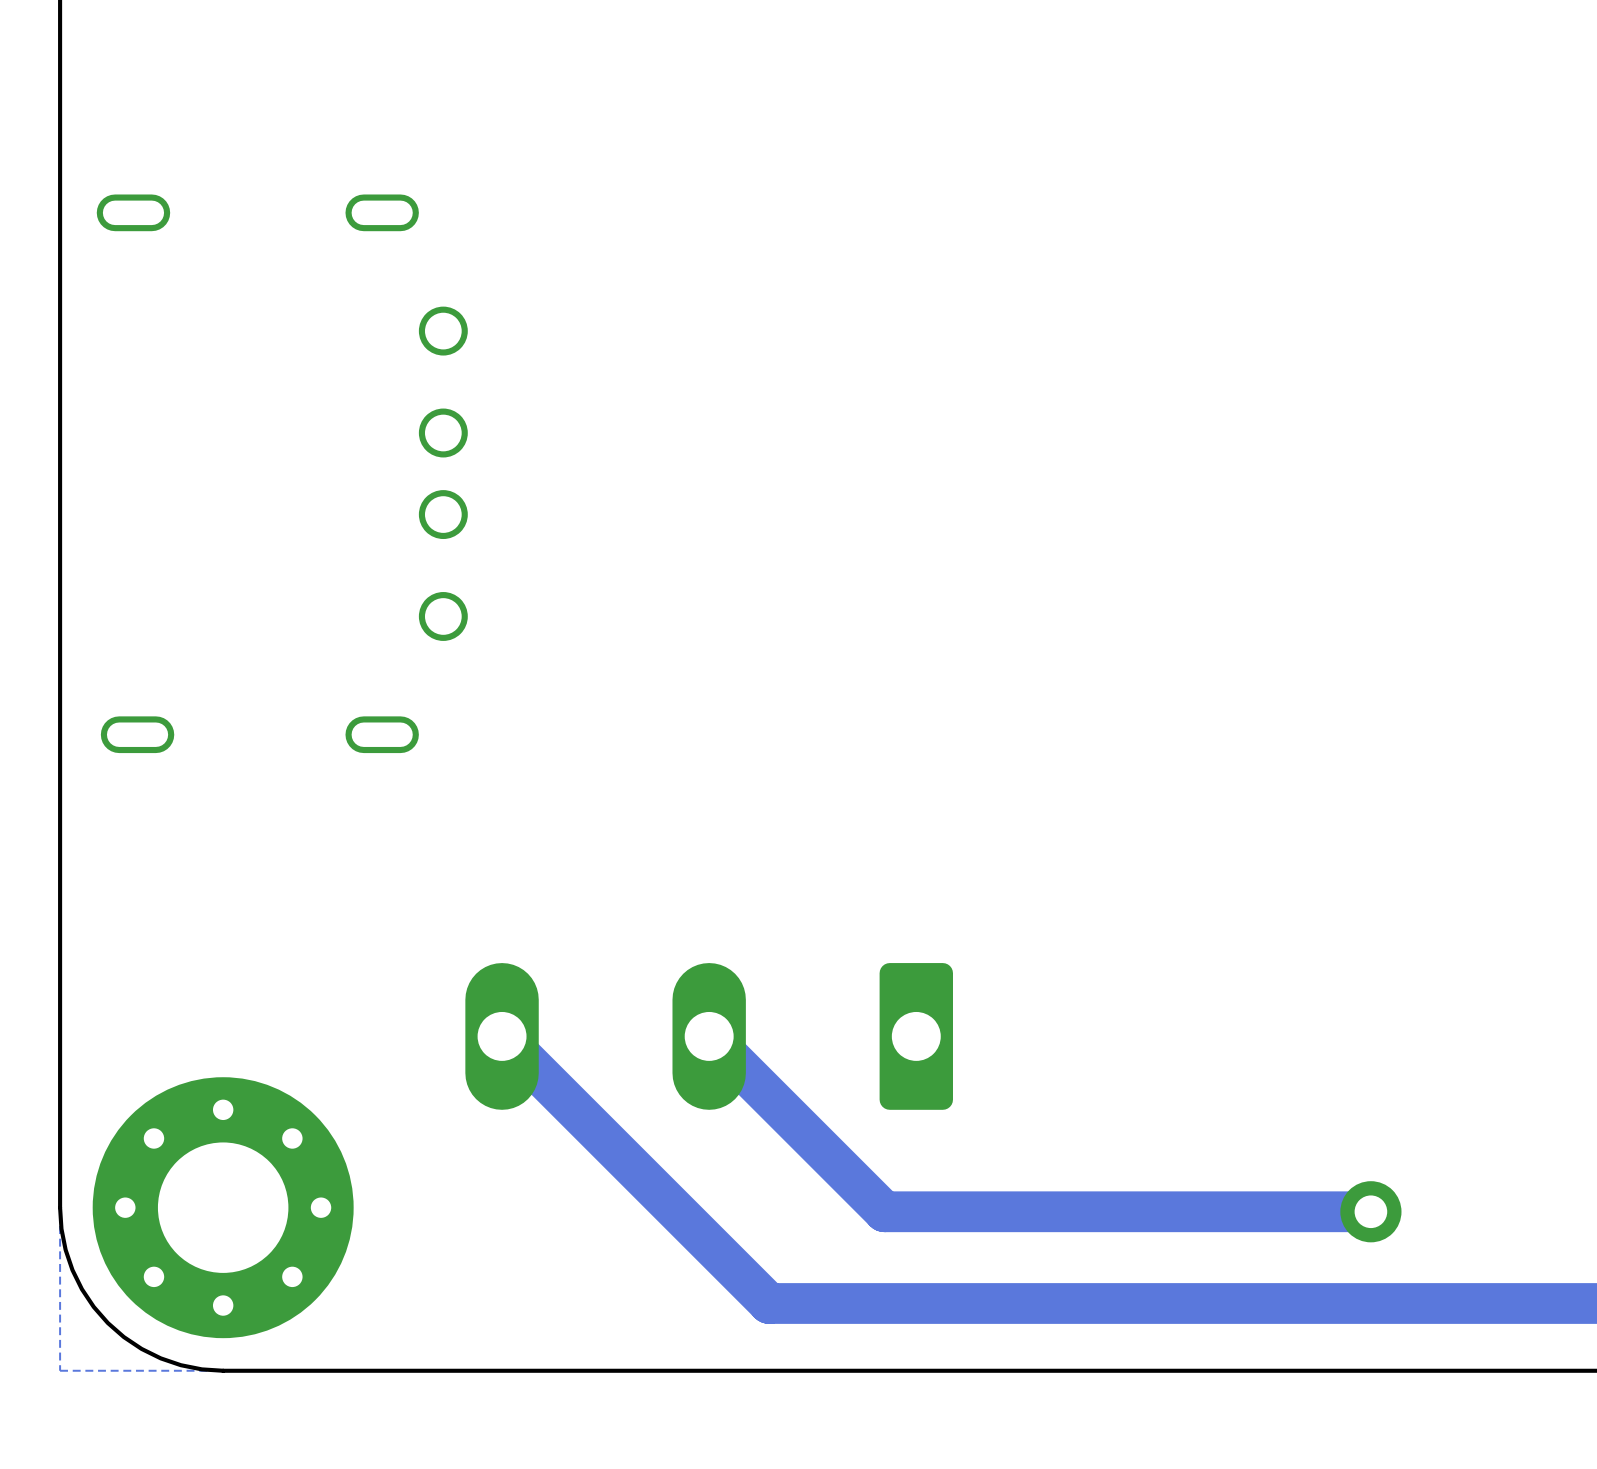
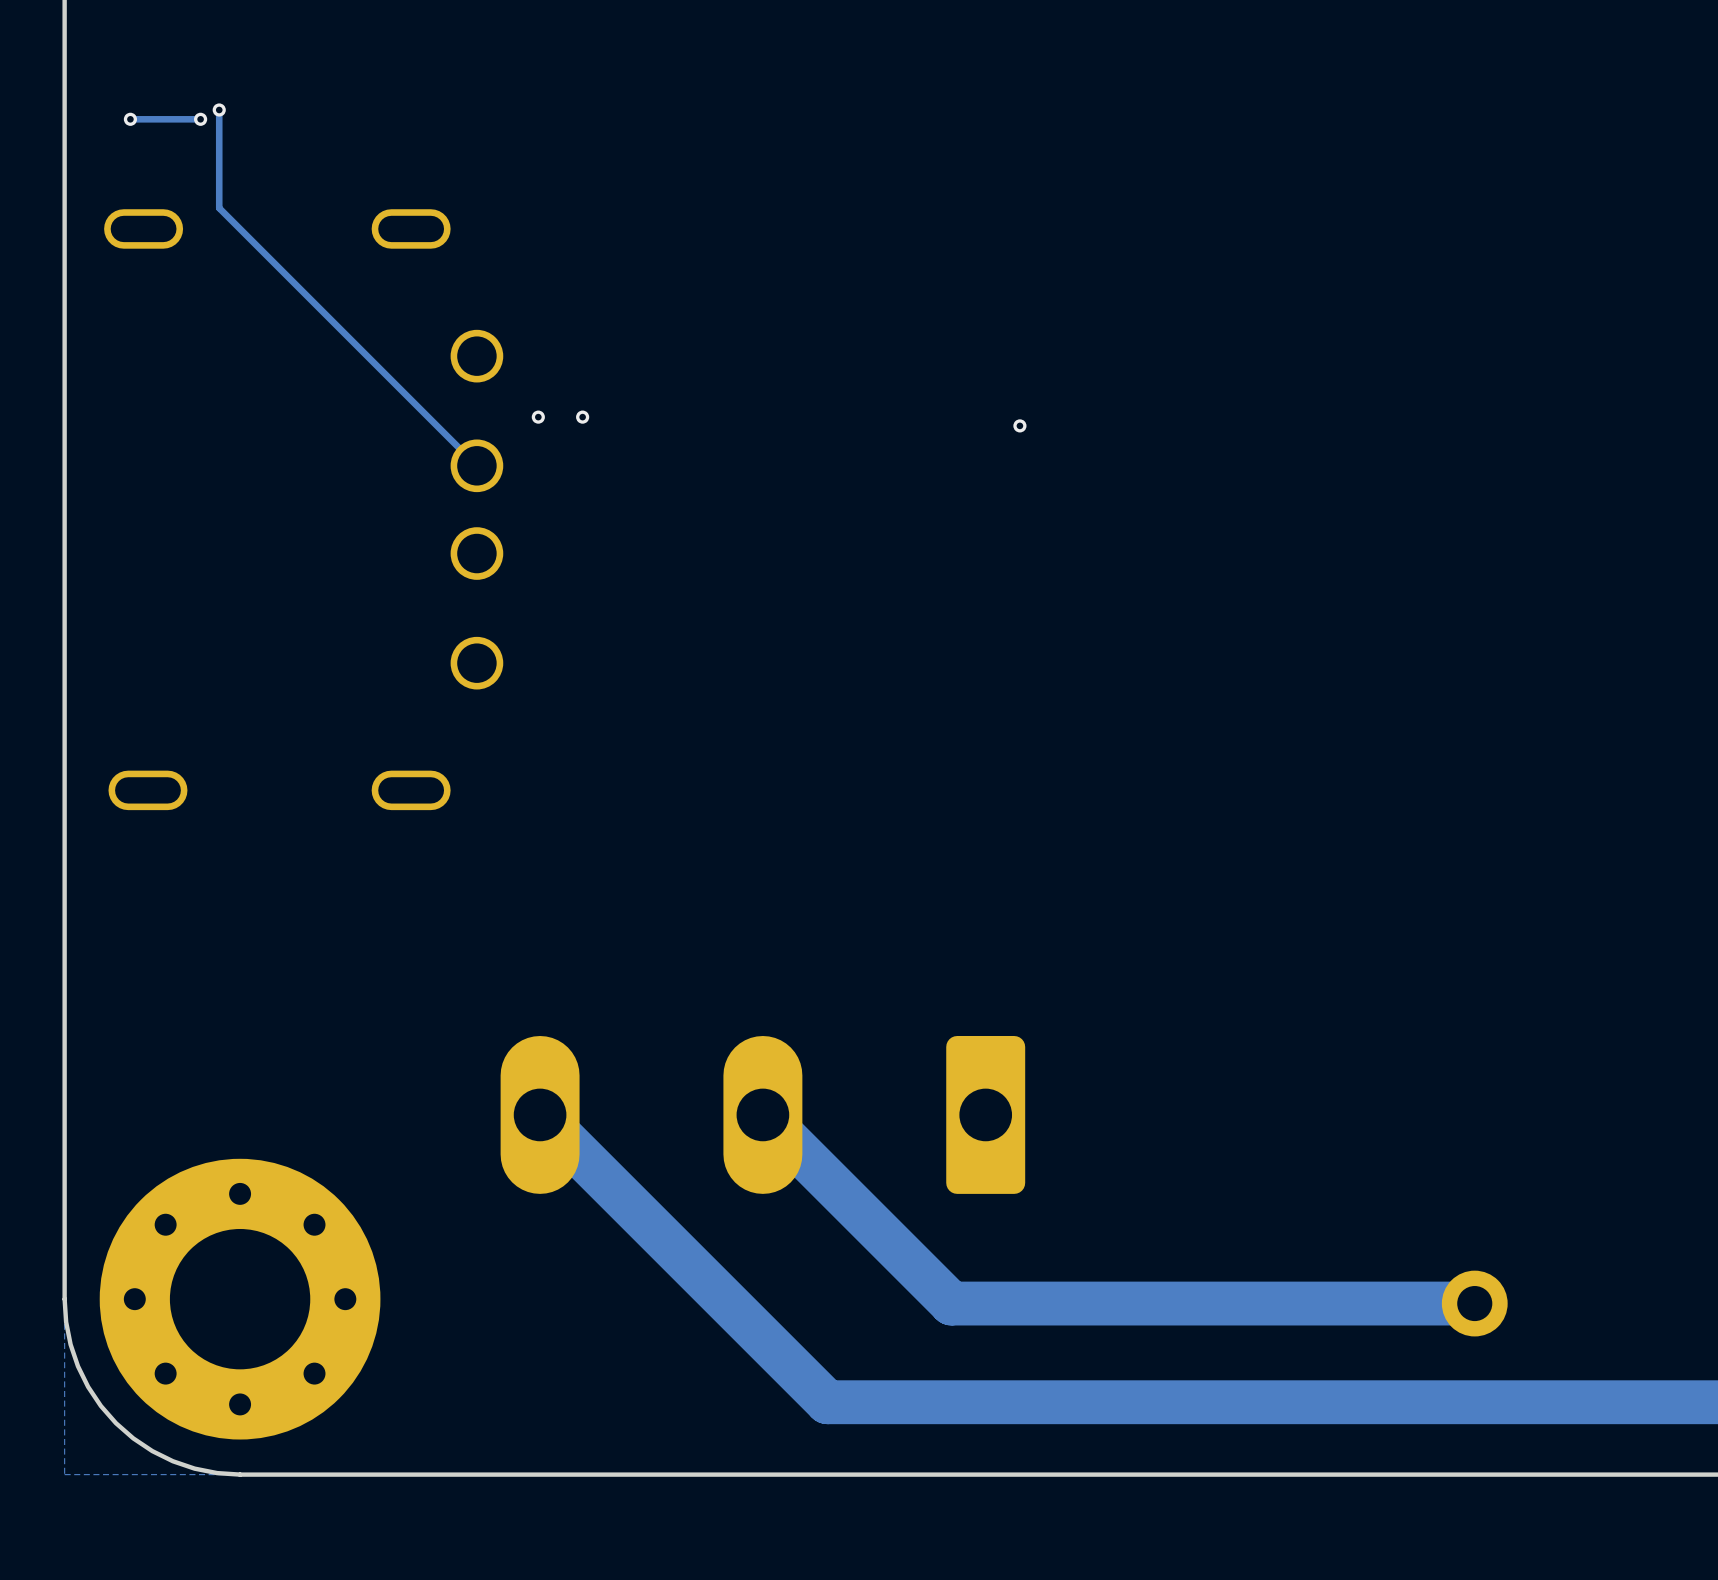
track: none -> (219, 109) (219, 208) (476, 465)
via: none -> (219, 109)
via: none -> (130, 119)
track: none -> (200, 119) (130, 119)
via: none -> (200, 119)
via: none -> (538, 417)
via: none -> (582, 417)
via: none -> (1019, 425)

